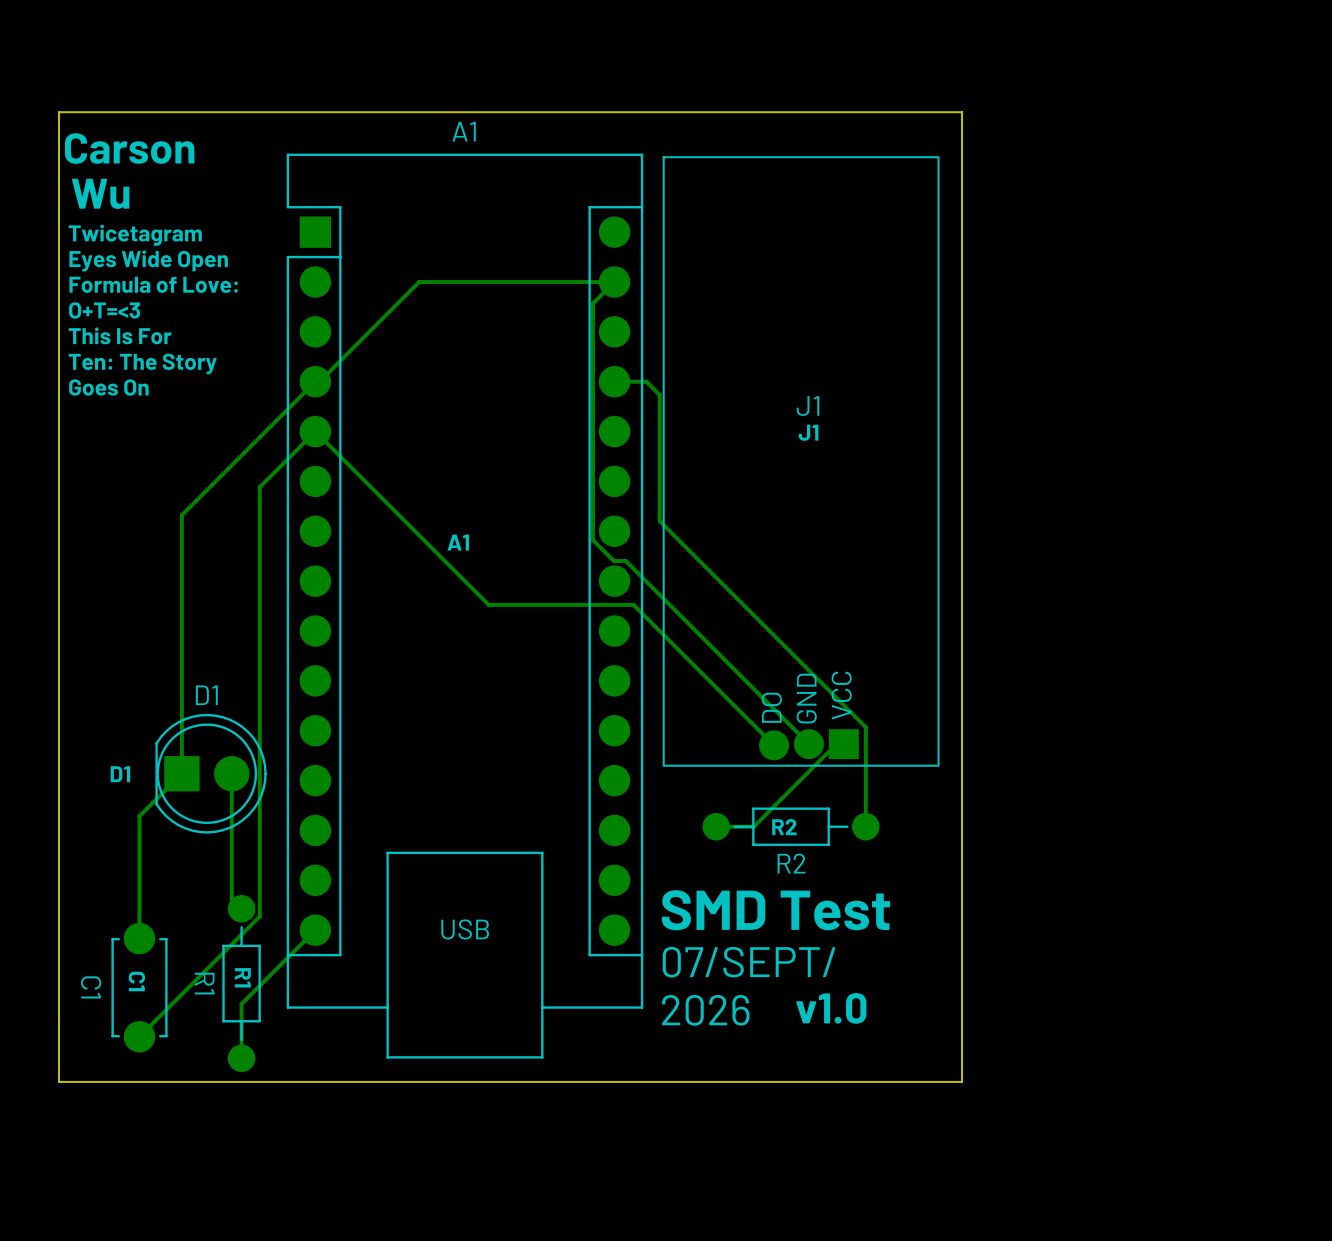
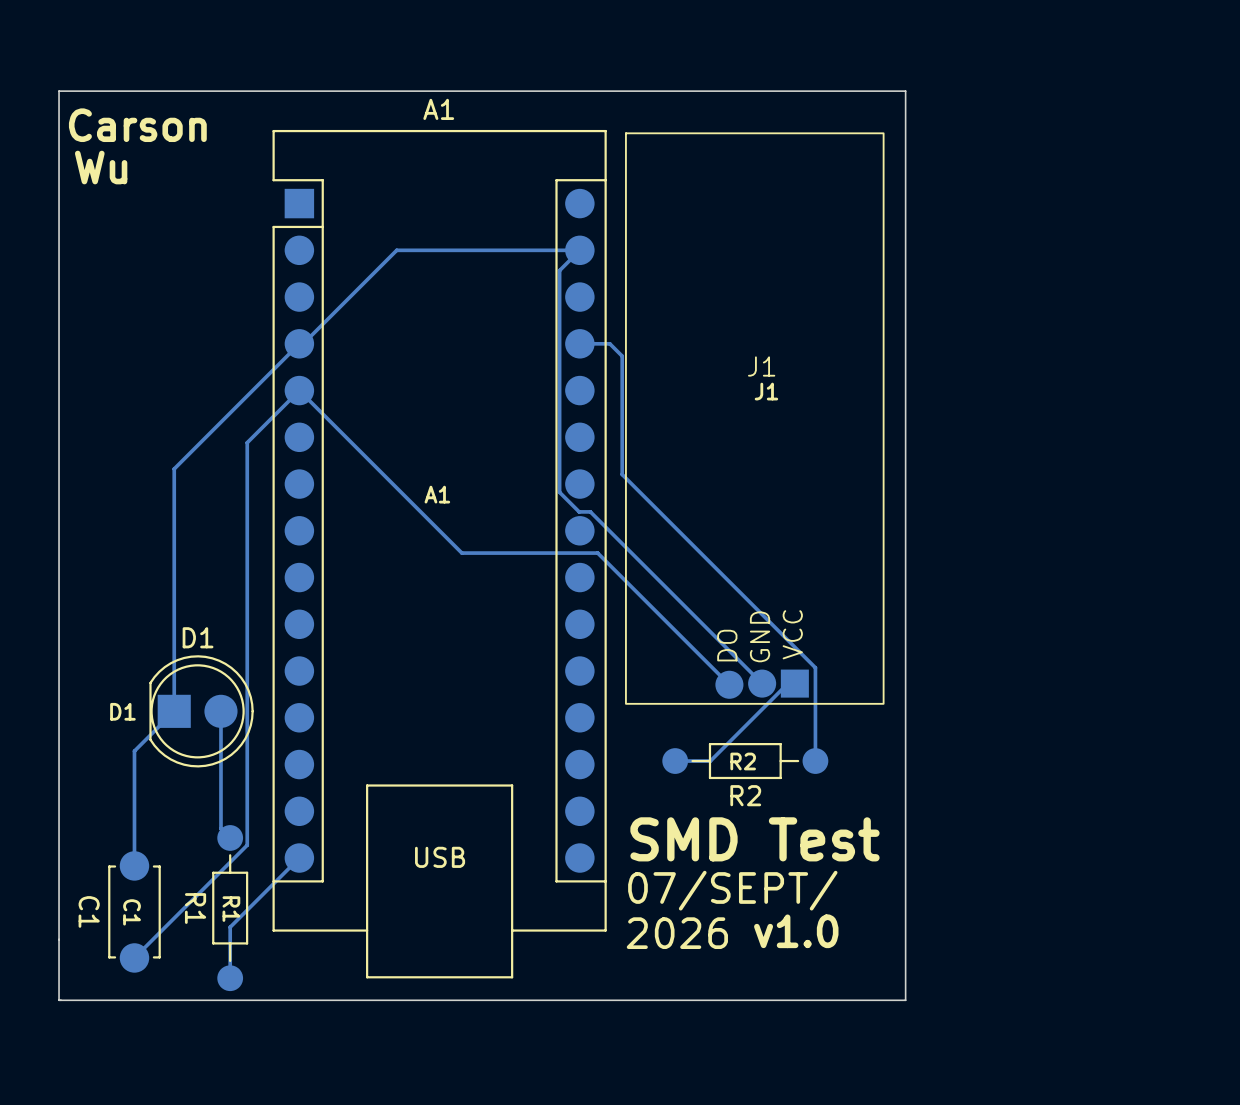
text: Twicetagram (135, 235) -> none
text: Eyes Wide Open (148, 260) -> none
text: Formula of Love: (153, 284) -> none
text: O+T=<3 (104, 310) -> none
text: This Is For (120, 335) -> none
text: Ten: The Story (142, 363) -> none
text: Goes On (108, 387) -> none

